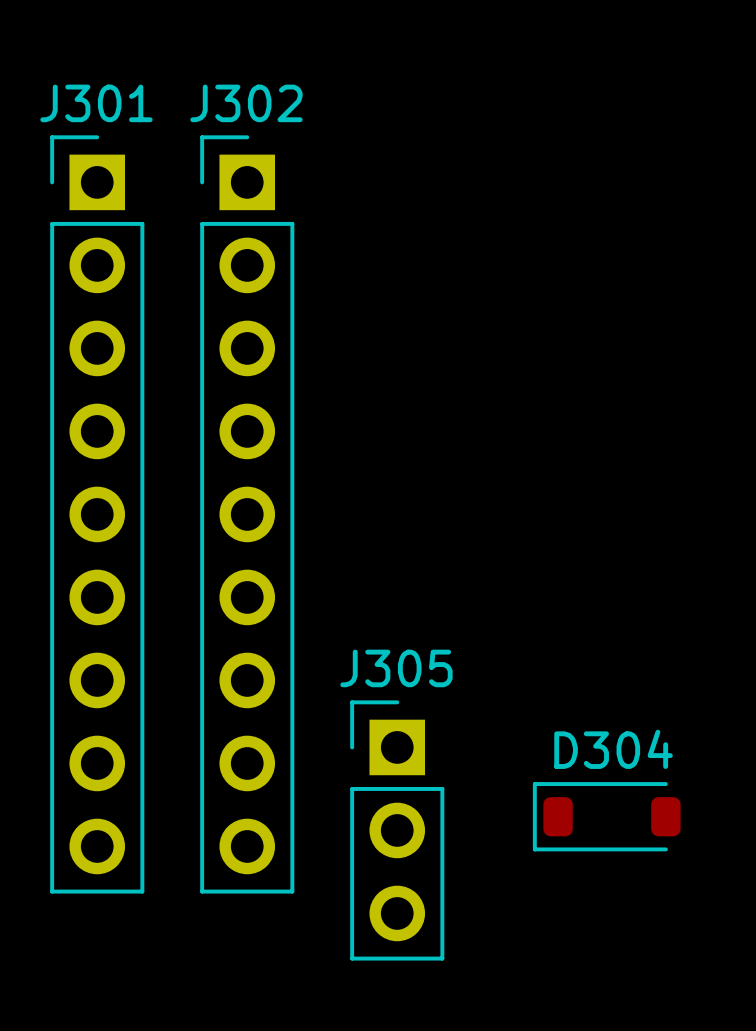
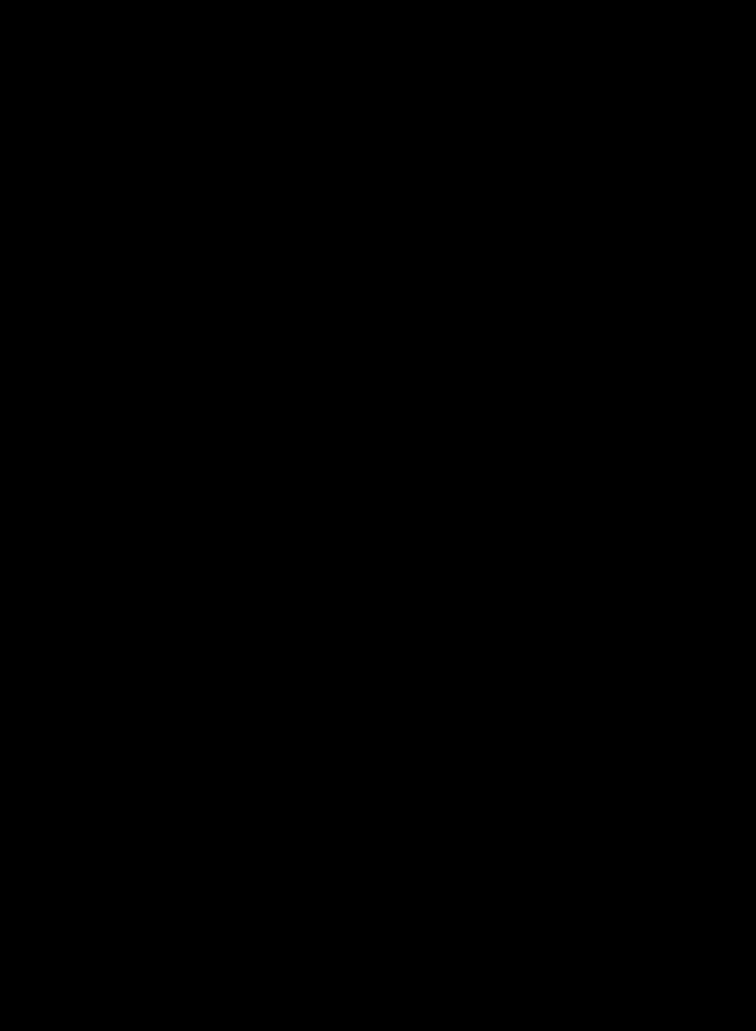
J301: (97, 514) -> none
J302: (247, 514) -> none
D304: (606, 816) -> none
J305: (397, 830) -> none

